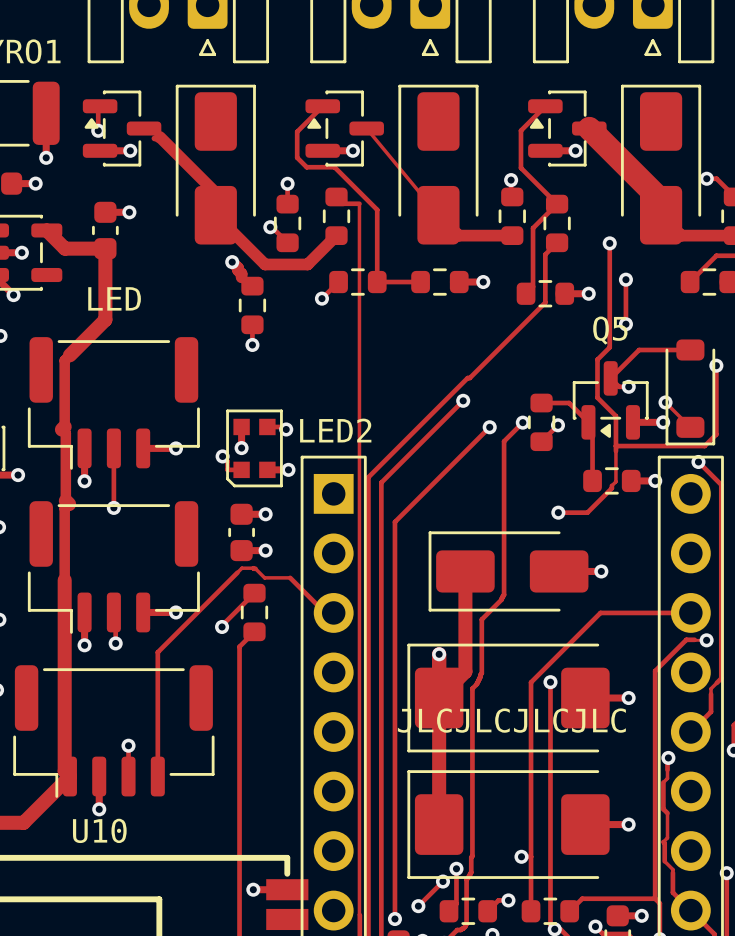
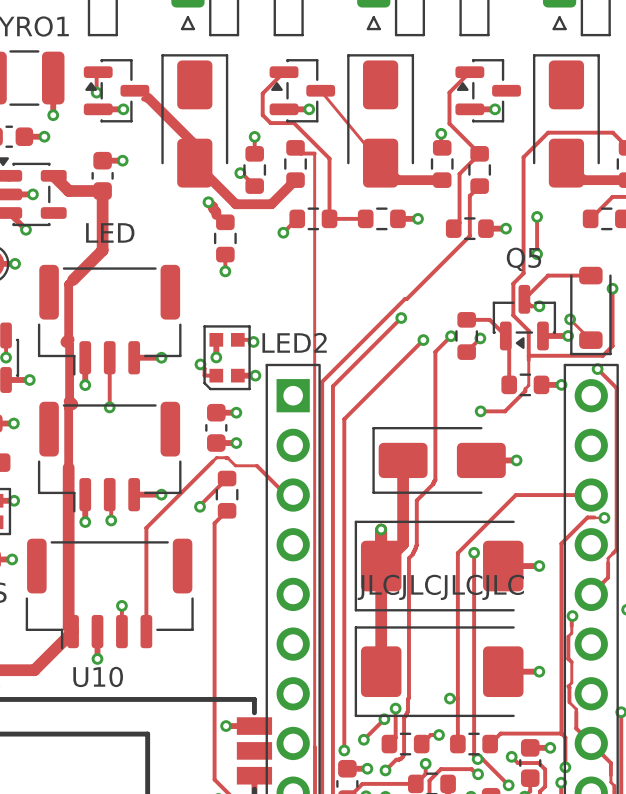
track: (589, 128) (661, 200) (661, 215) -> none
track: none -> (604, 132) (548, 132) (523, 157) (523, 186)
via: (706, 178) -> none
via: (609, 243) -> none

